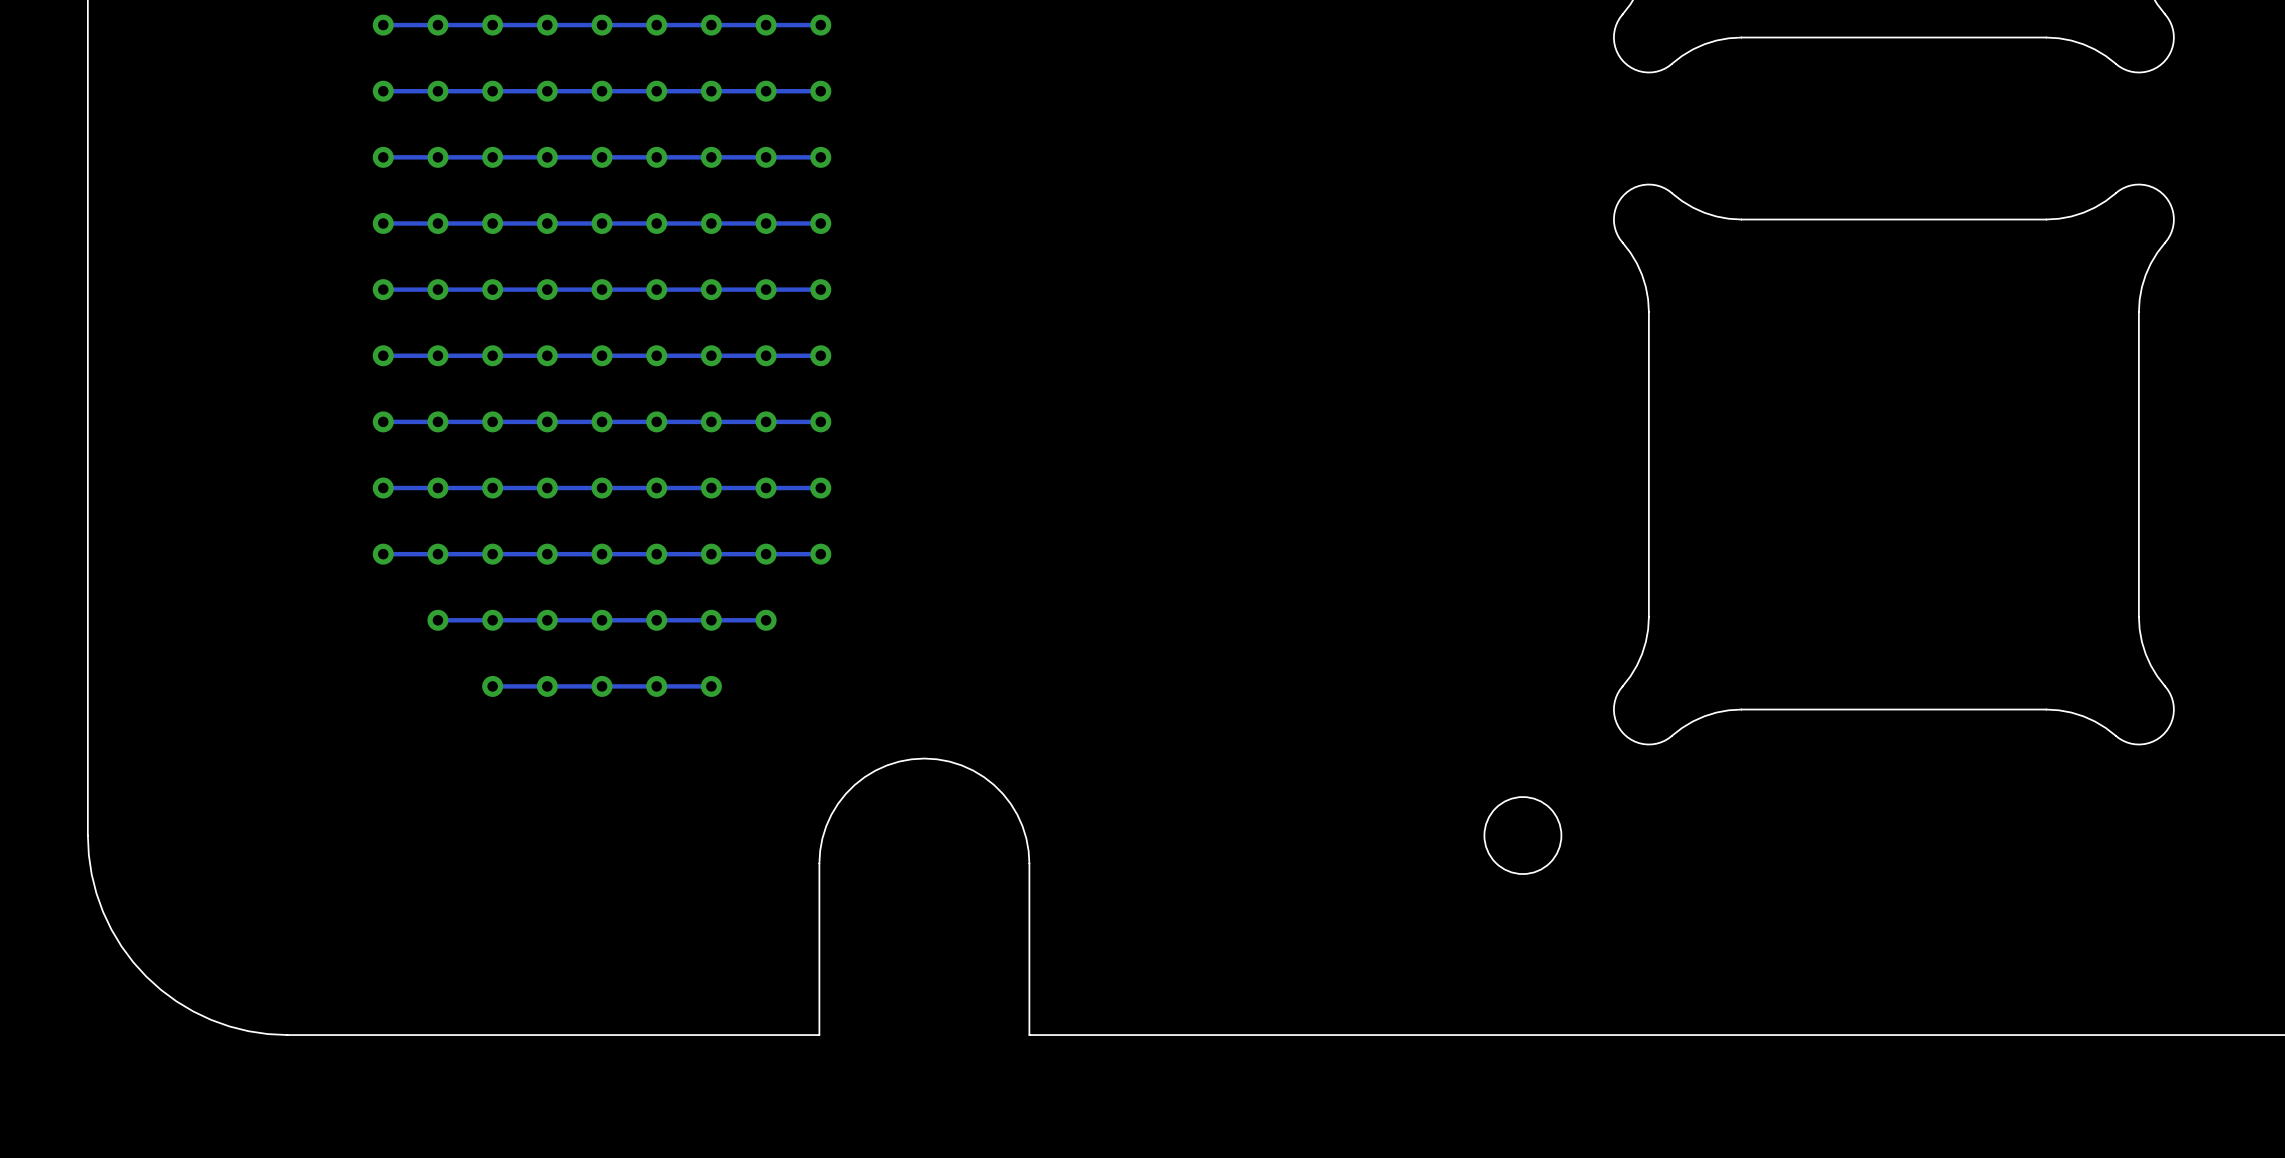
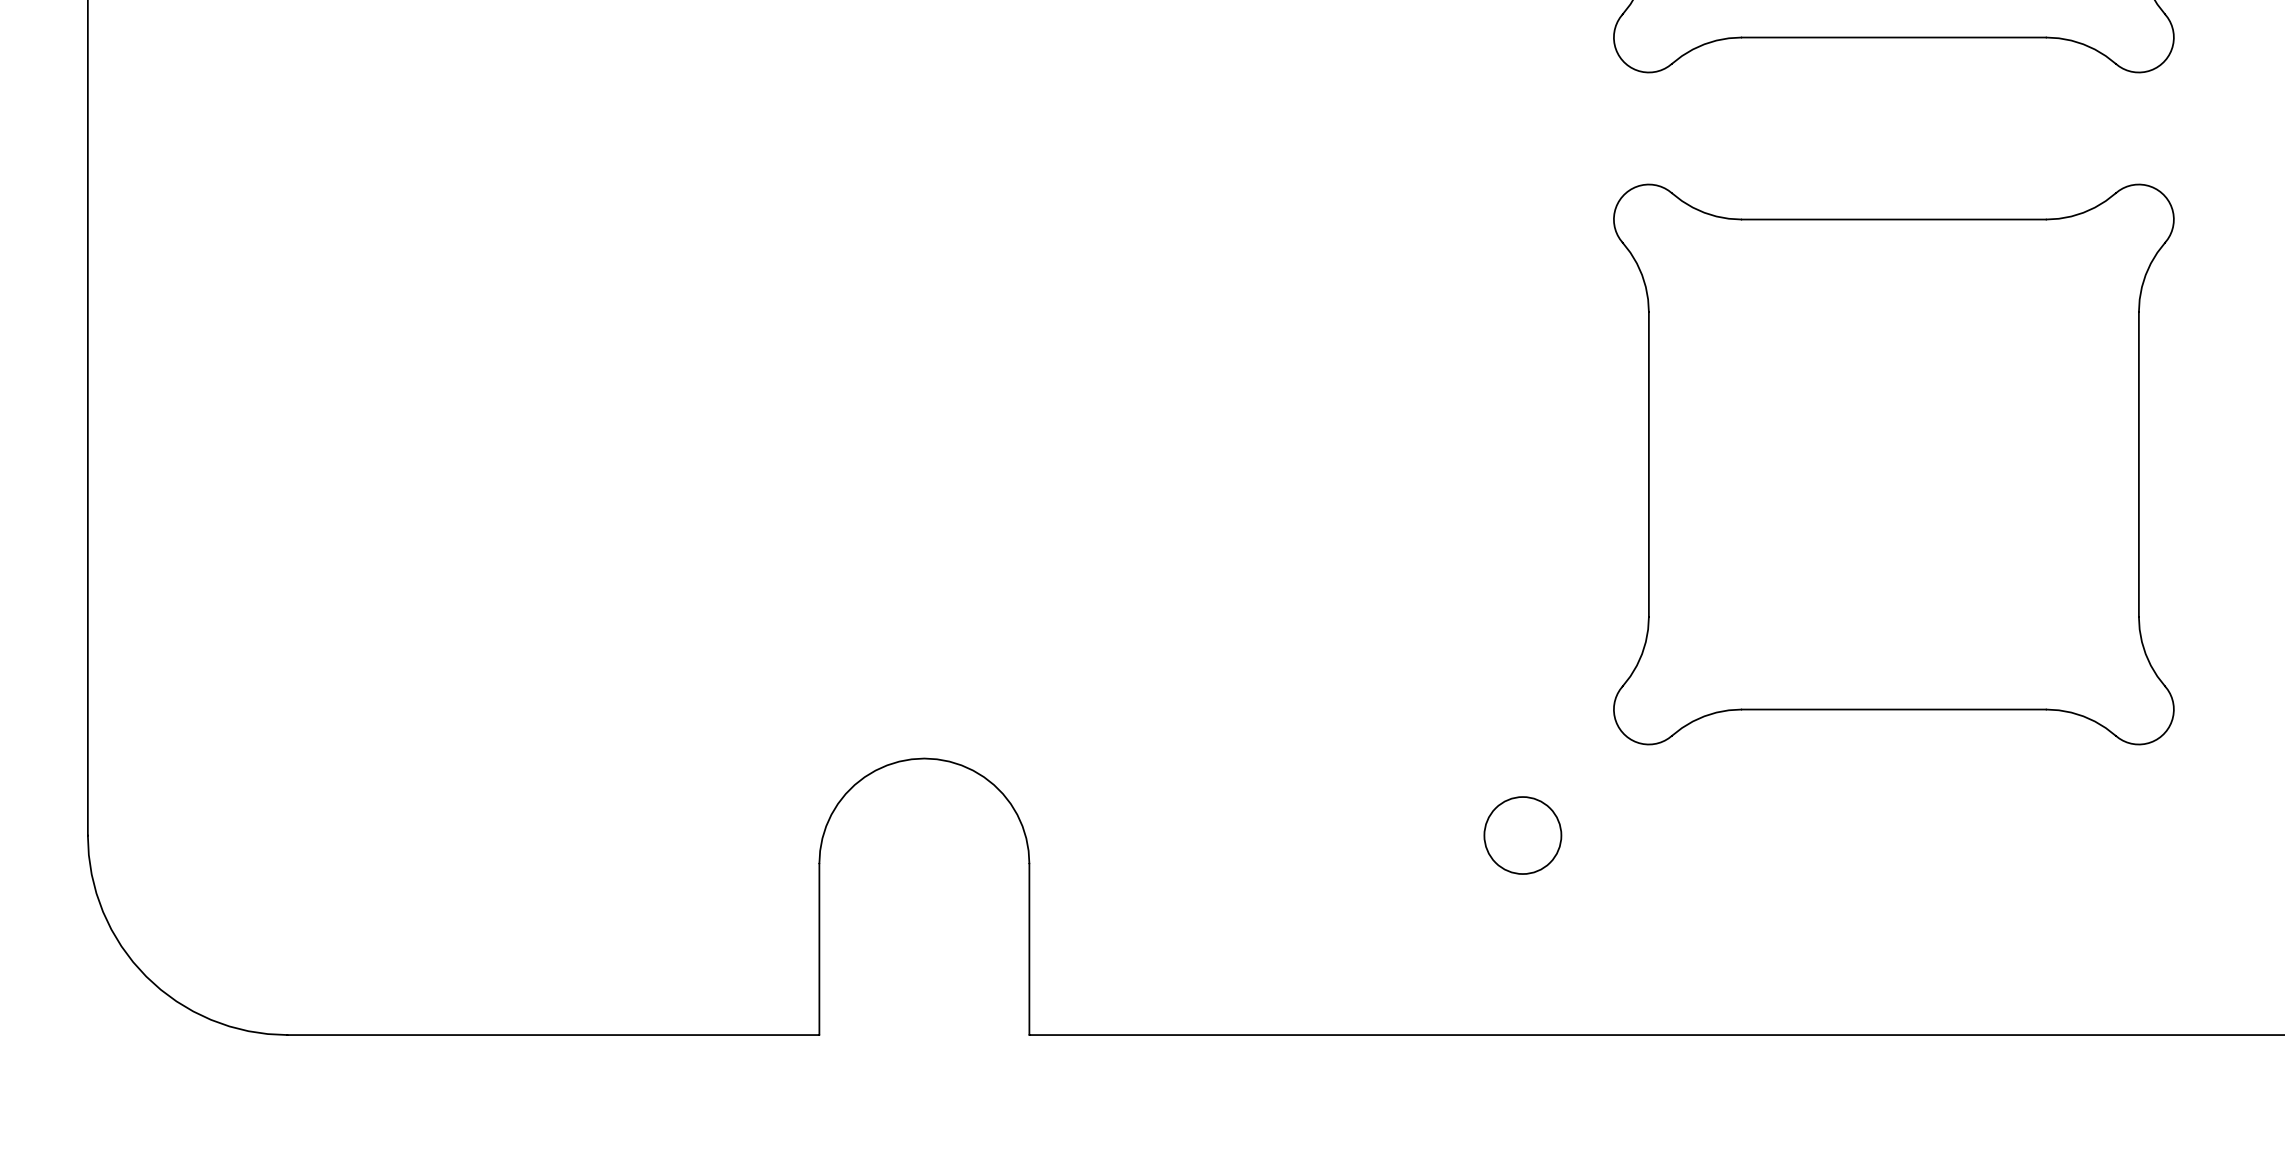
via: (383, 25) -> none
via: (437, 25) -> none
via: (492, 25) -> none
via: (547, 25) -> none
via: (602, 25) -> none
via: (656, 25) -> none
via: (711, 25) -> none
via: (766, 25) -> none
track: (820, 25) (383, 25) -> none
via: (820, 25) -> none
via: (383, 91) -> none
via: (437, 91) -> none
via: (492, 91) -> none
via: (547, 91) -> none
via: (602, 91) -> none
via: (656, 91) -> none
via: (711, 91) -> none
via: (766, 91) -> none
track: (820, 91) (383, 91) -> none
via: (820, 91) -> none
via: (383, 157) -> none
via: (437, 157) -> none
via: (492, 157) -> none
via: (547, 157) -> none
via: (602, 157) -> none
via: (656, 157) -> none
via: (711, 157) -> none
via: (766, 157) -> none
track: (820, 157) (383, 157) -> none
via: (820, 157) -> none
via: (383, 223) -> none
via: (437, 223) -> none
via: (492, 223) -> none
via: (547, 223) -> none
via: (602, 223) -> none
via: (656, 223) -> none
via: (711, 223) -> none
via: (766, 223) -> none
track: (820, 223) (383, 223) -> none
via: (820, 223) -> none
via: (383, 289) -> none
via: (437, 289) -> none
via: (492, 289) -> none
via: (547, 289) -> none
via: (602, 289) -> none
via: (656, 289) -> none
via: (711, 289) -> none
via: (766, 289) -> none
track: (820, 289) (383, 289) -> none
via: (820, 289) -> none
via: (383, 355) -> none
via: (437, 355) -> none
via: (492, 355) -> none
via: (547, 355) -> none
via: (602, 355) -> none
via: (656, 355) -> none
via: (711, 355) -> none
via: (766, 355) -> none
track: (820, 355) (383, 355) -> none
via: (820, 355) -> none
via: (383, 421) -> none
via: (437, 421) -> none
via: (492, 421) -> none
via: (547, 421) -> none
via: (602, 421) -> none
via: (656, 421) -> none
via: (711, 421) -> none
via: (766, 421) -> none
track: (820, 421) (383, 421) -> none
via: (820, 421) -> none
via: (383, 488) -> none
via: (437, 488) -> none
via: (492, 488) -> none
via: (547, 488) -> none
via: (602, 488) -> none
via: (656, 488) -> none
via: (711, 488) -> none
via: (766, 488) -> none
track: (820, 488) (383, 488) -> none
via: (820, 488) -> none
via: (383, 554) -> none
via: (437, 554) -> none
via: (492, 554) -> none
via: (547, 554) -> none
via: (602, 554) -> none
via: (656, 554) -> none
via: (711, 554) -> none
via: (766, 554) -> none
track: (820, 554) (383, 554) -> none
via: (820, 554) -> none
via: (437, 620) -> none
via: (492, 620) -> none
via: (547, 620) -> none
via: (602, 620) -> none
via: (656, 620) -> none
via: (711, 620) -> none
track: (766, 620) (437, 620) -> none
via: (766, 620) -> none
via: (492, 686) -> none
via: (547, 686) -> none
via: (602, 686) -> none
via: (656, 686) -> none
track: (711, 686) (492, 686) -> none
via: (711, 686) -> none

